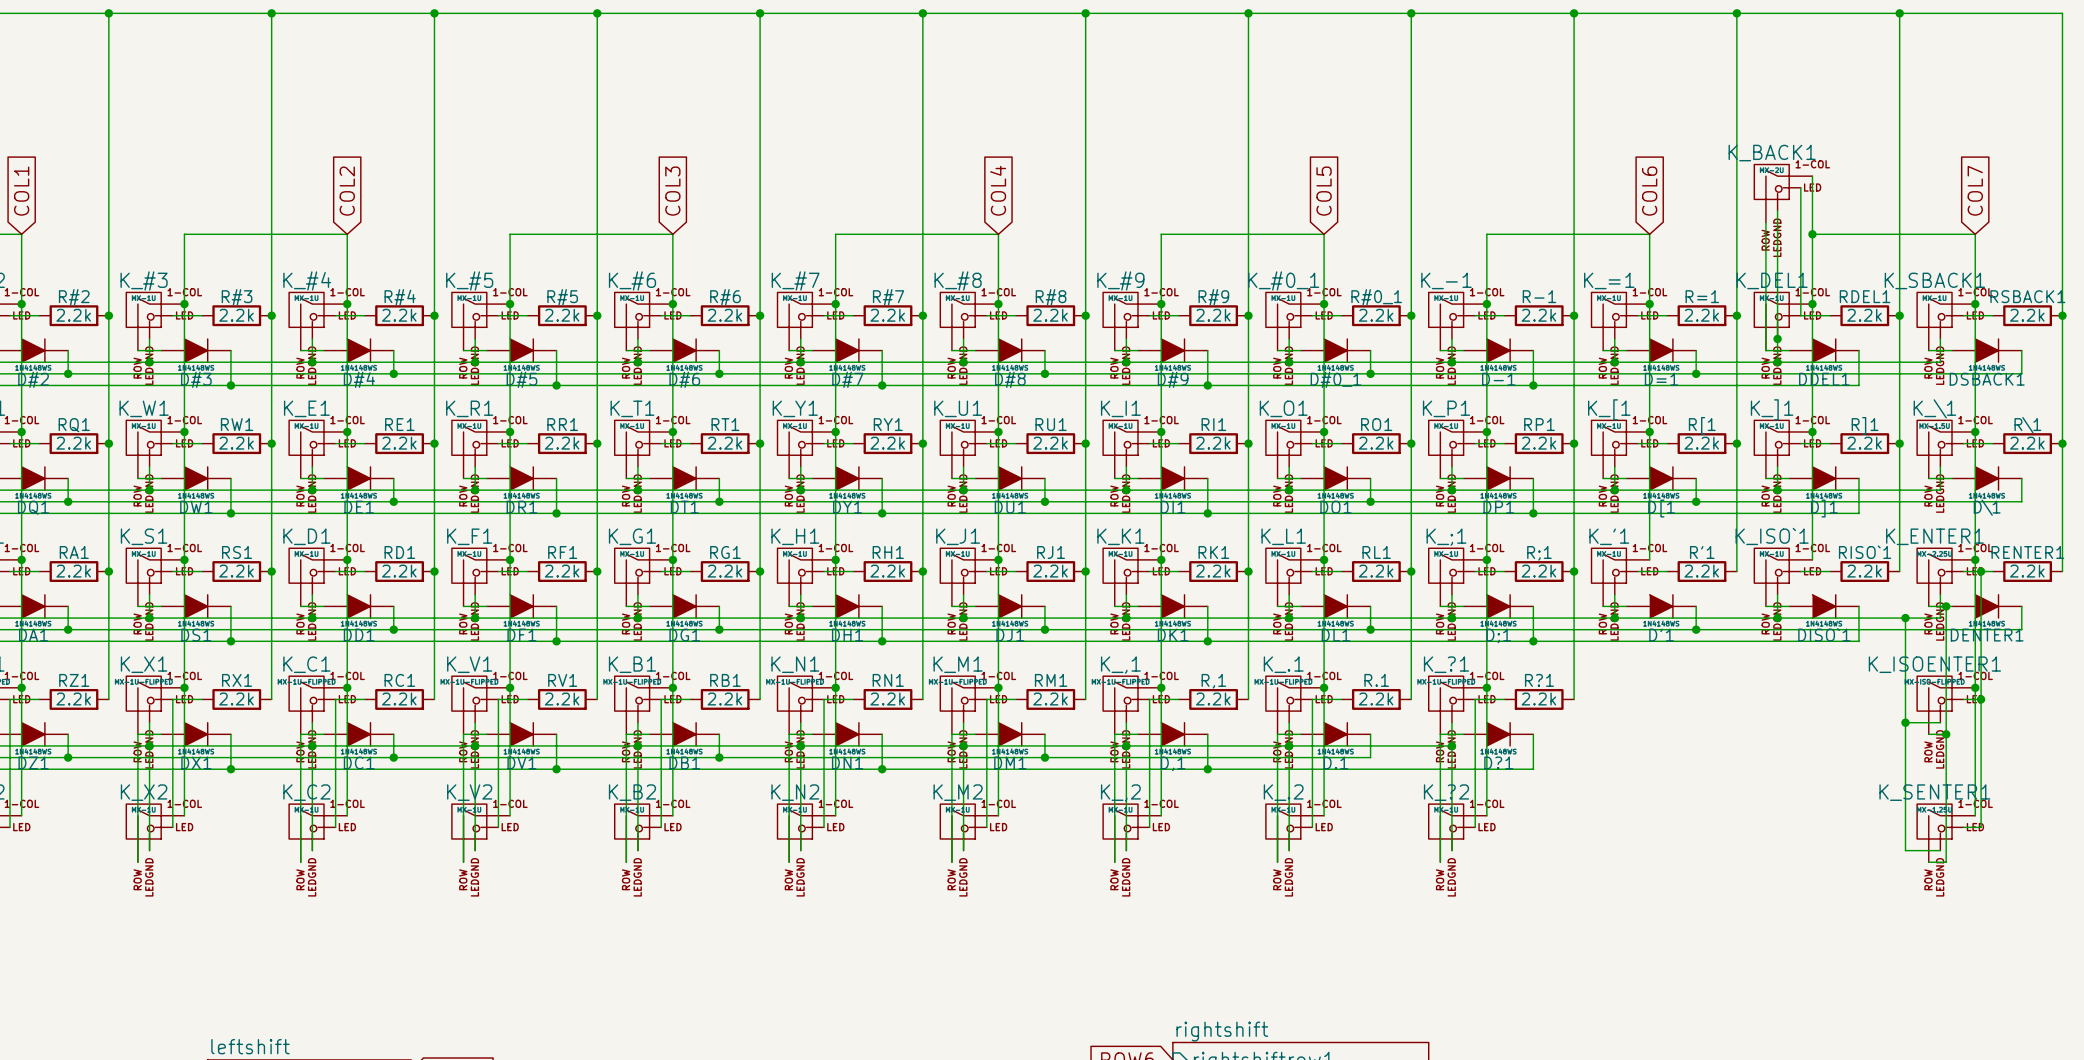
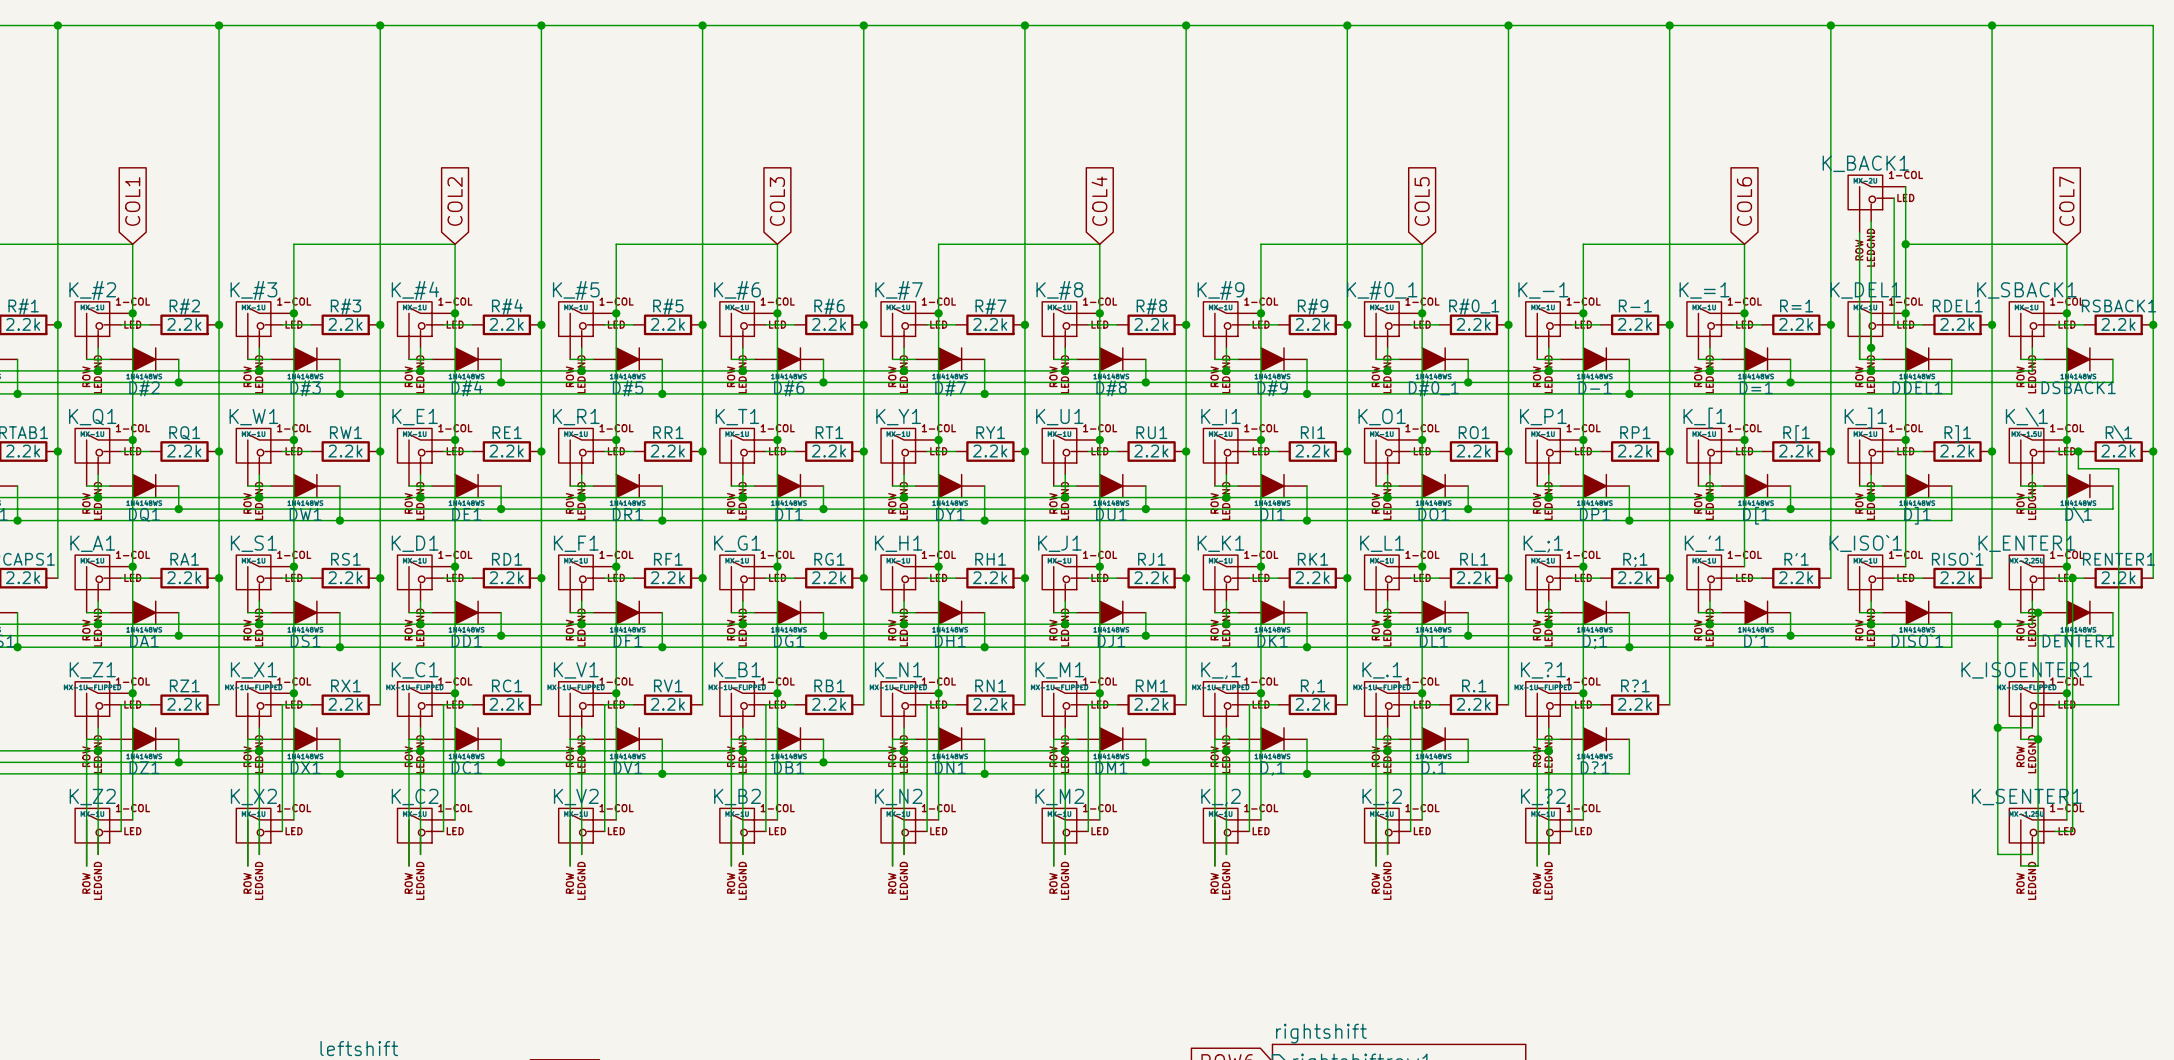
wire: none -> (2078, 451) (2078, 468) (2118, 468) (2118, 704) (2072, 704)
junction: none -> (2078, 451)
junction: (1981, 699) -> none

